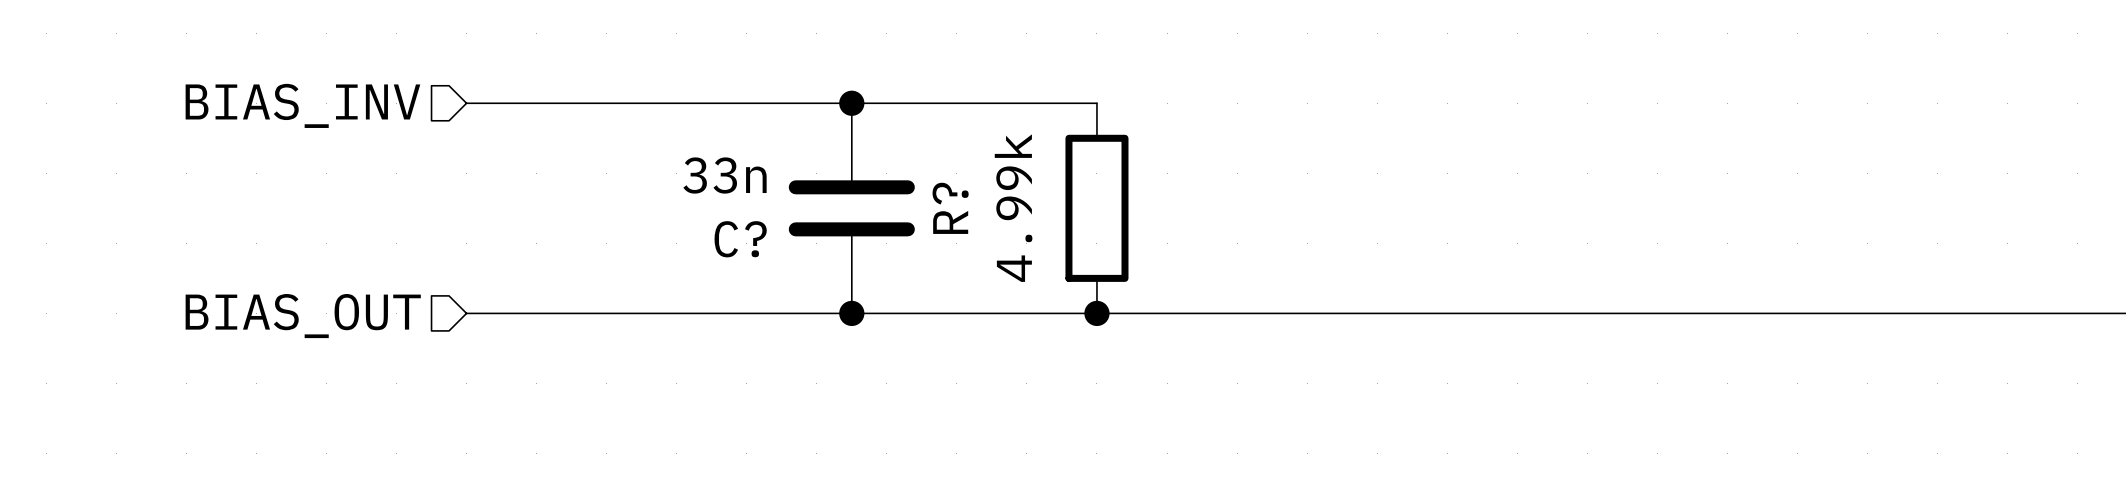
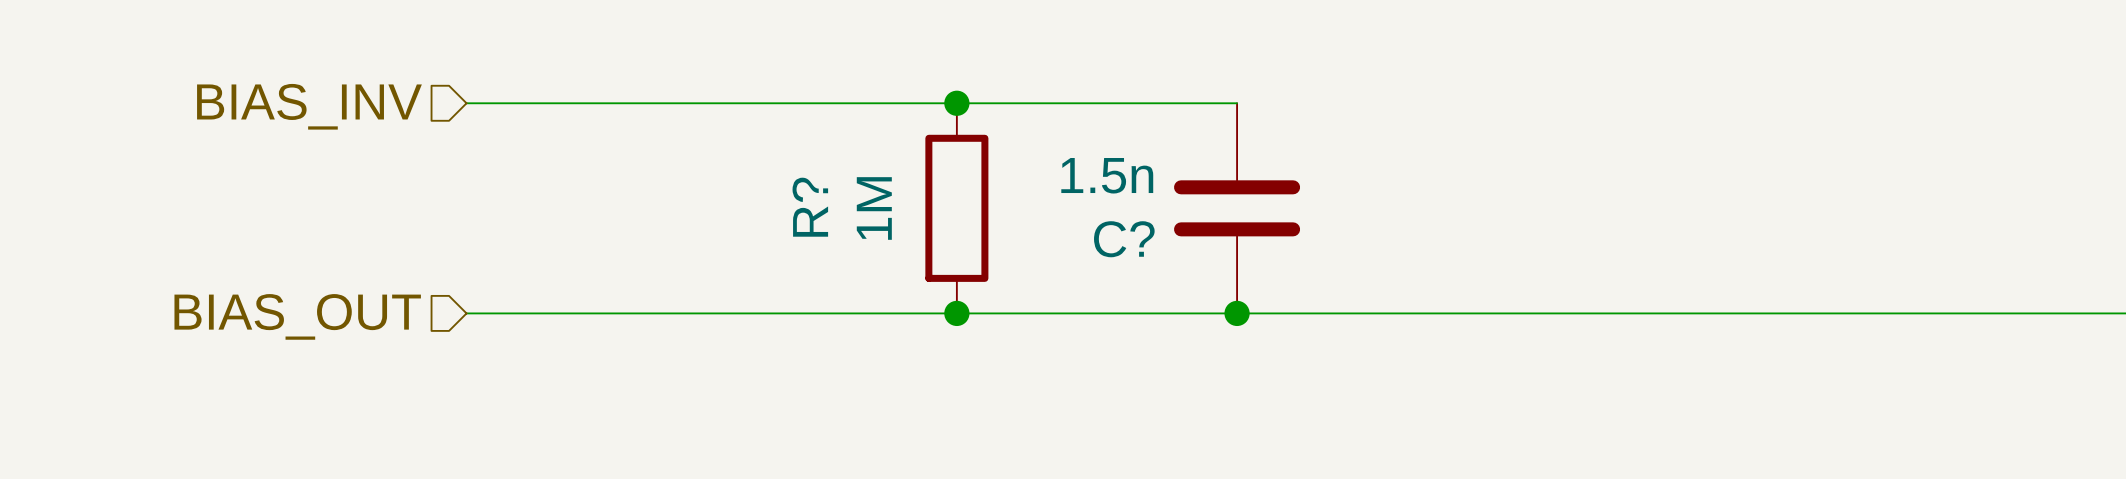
junction position: (851, 103) -> (956, 103)
wire: none -> (1096, 103) (1237, 103)
C?: 33n (851, 208) -> none
R?: none -> 1M (956, 208)
R?: 4.99k (1096, 208) -> none
C?: none -> 1.5n (1237, 208)
junction: (851, 313) -> none
junction: none -> (956, 313)
junction: (1096, 313) -> none
junction: none -> (1237, 313)

